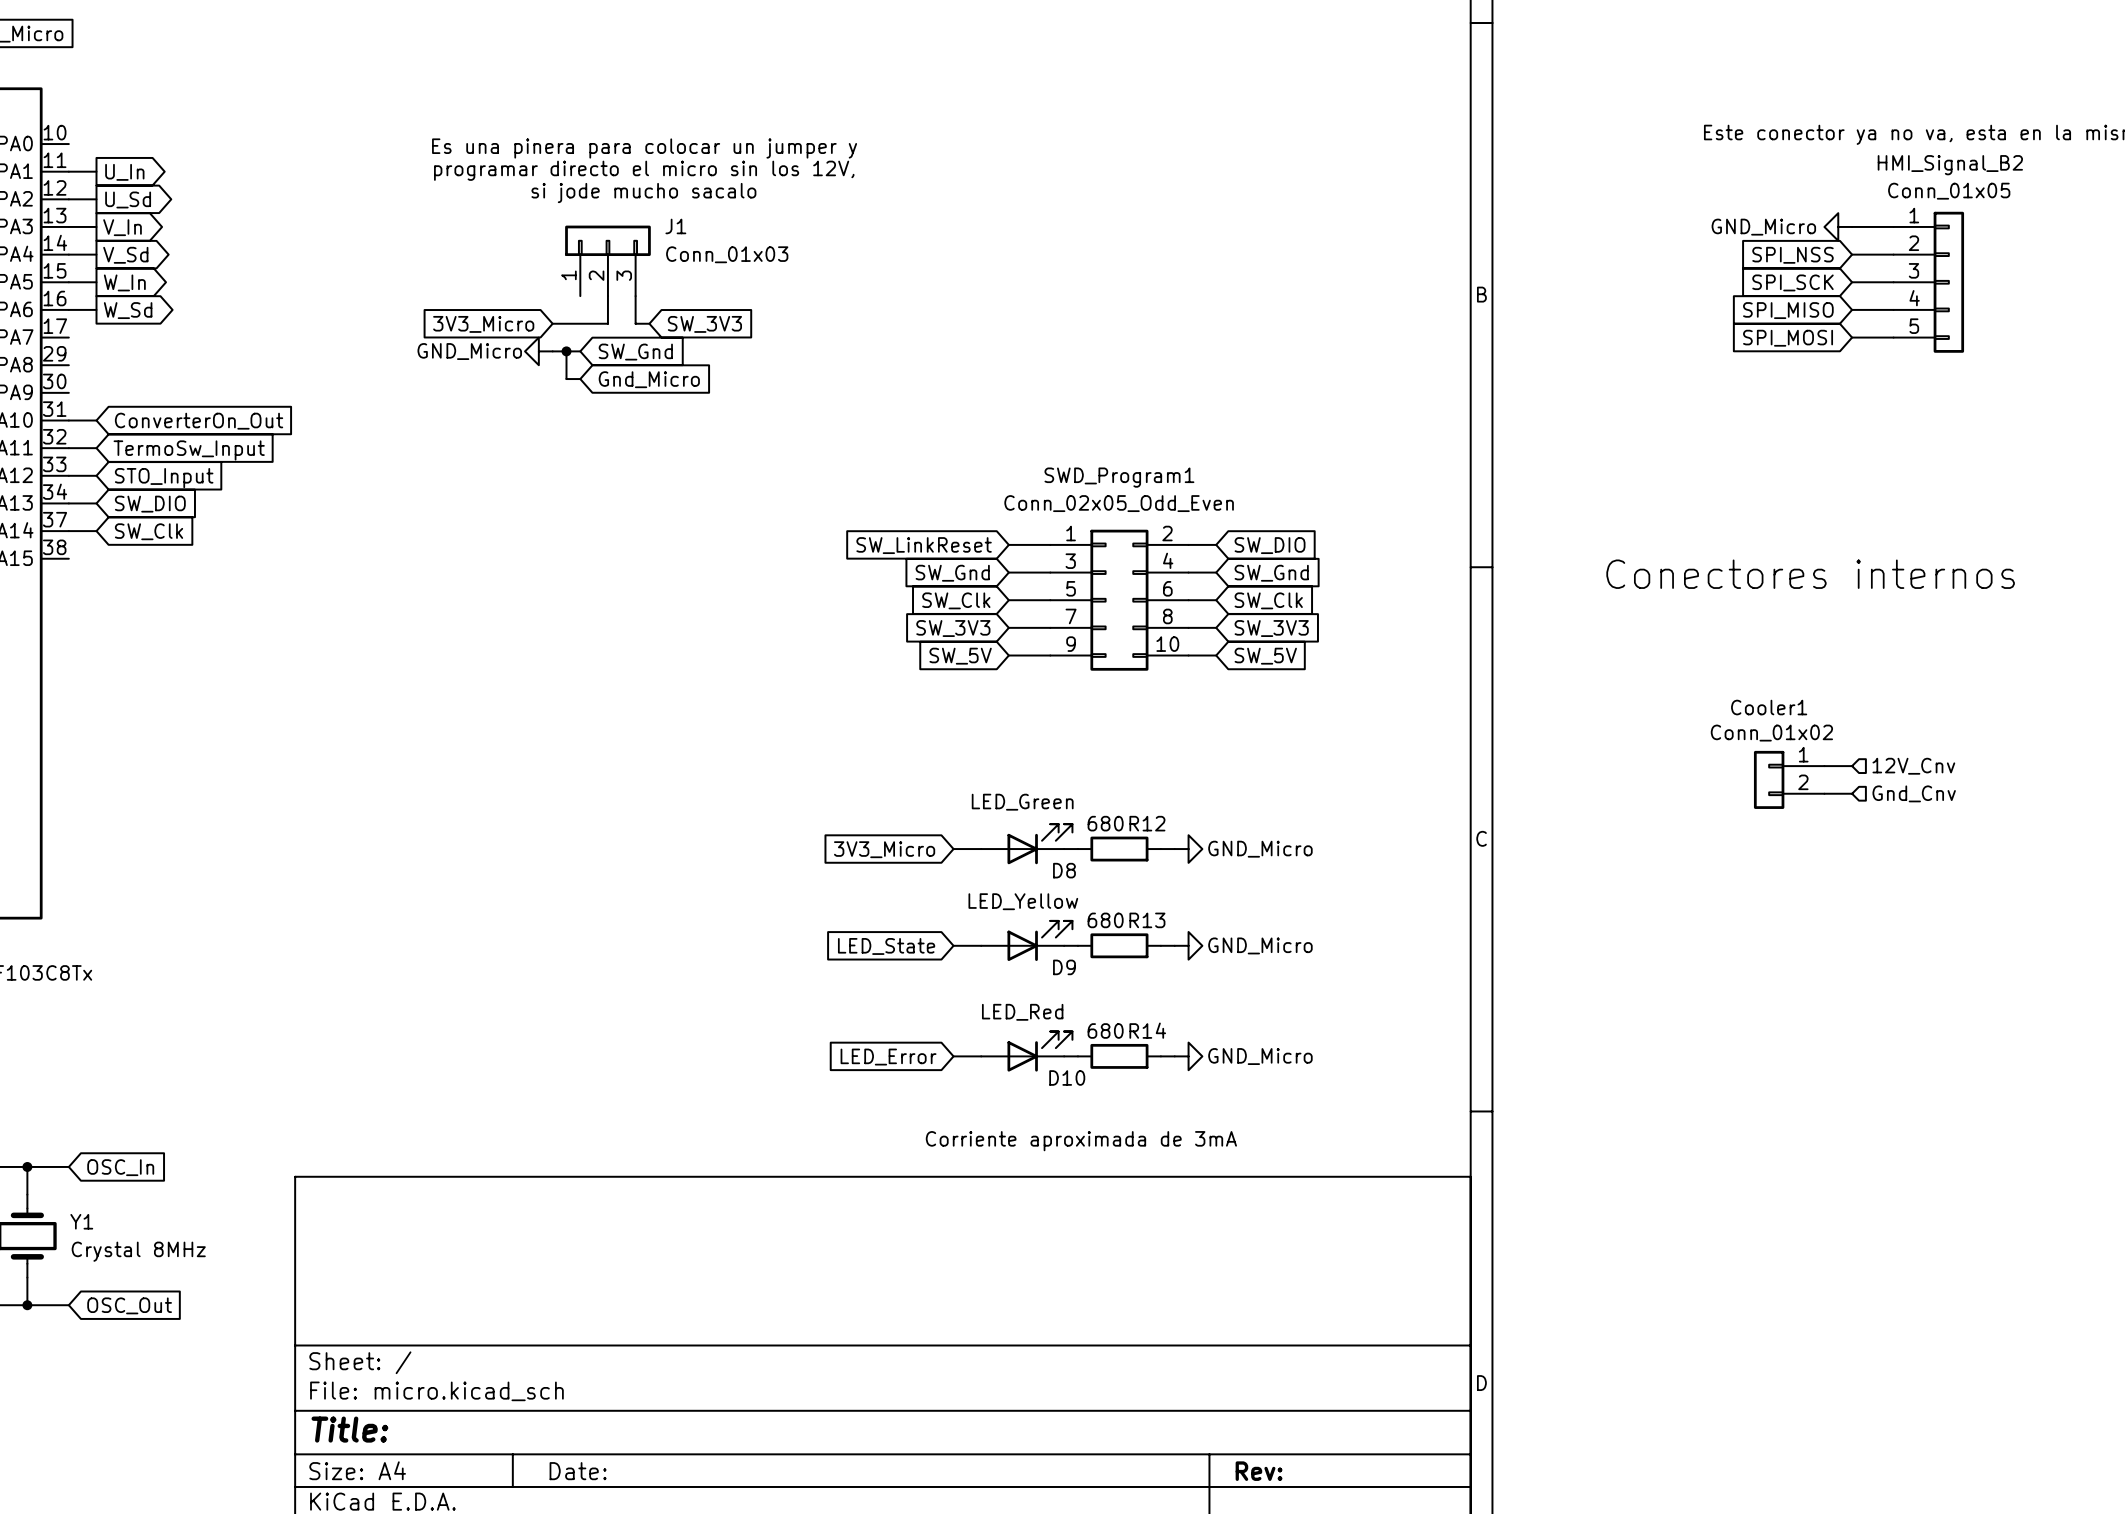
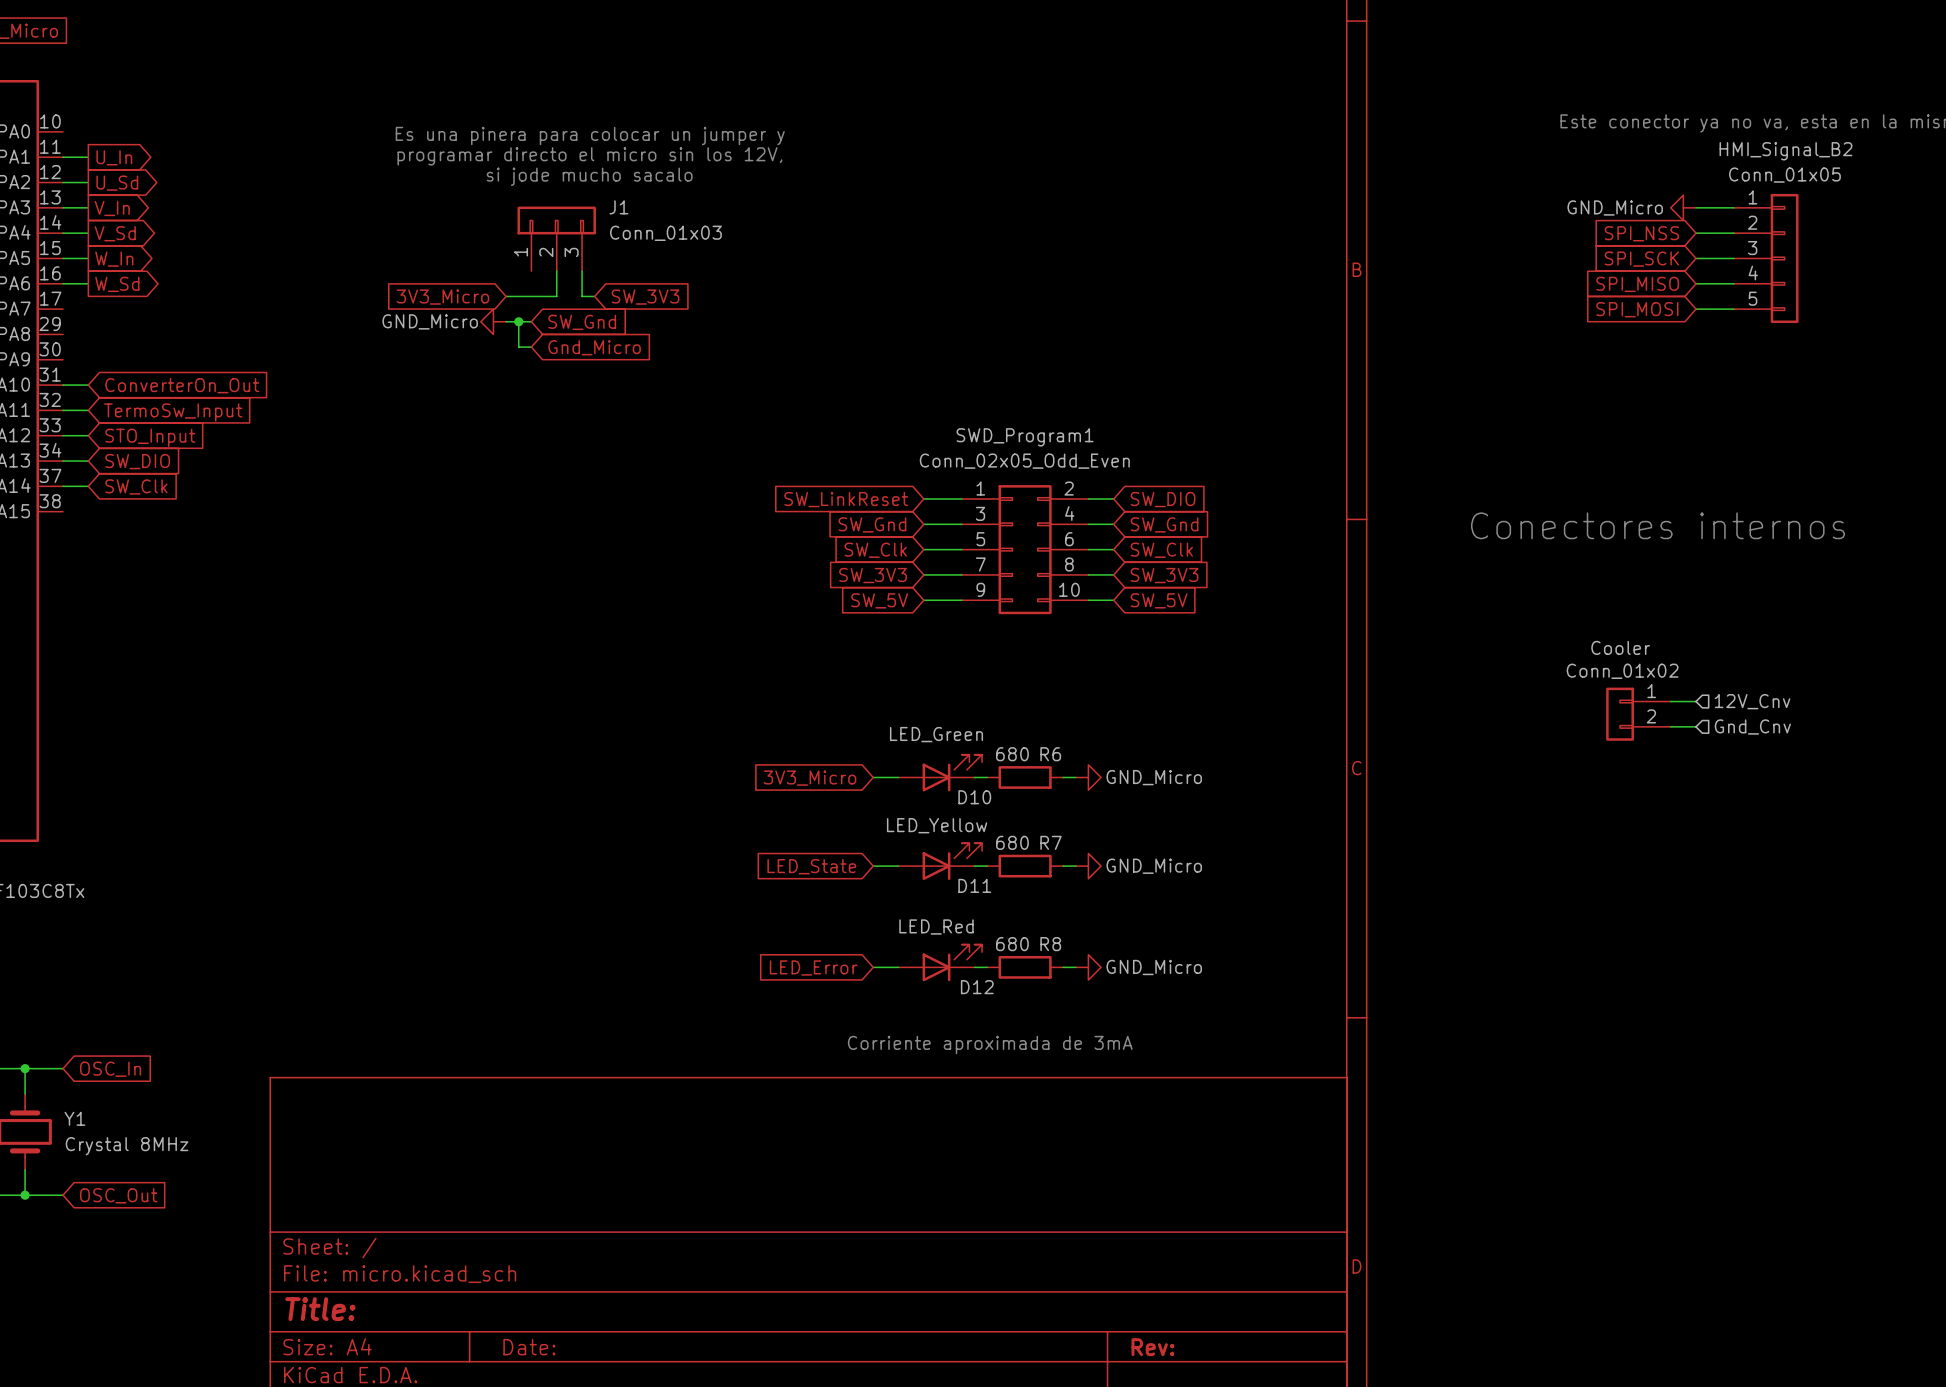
Cooler1 name: Cooler1 (1769, 707) -> Cooler (1620, 647)
R12 name: R12 (1147, 823) -> R6 (1050, 754)
D8 name: D8 (1064, 870) -> D10 (974, 797)
R13 name: R13 (1147, 920) -> R7 (1051, 842)
D9 name: D9 (1064, 967) -> D11 (974, 885)
R14 name: R14 (1147, 1030) -> R8 (1050, 944)
D10 name: D10 (1067, 1077) -> D12 (977, 987)

